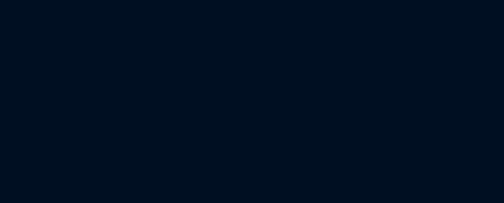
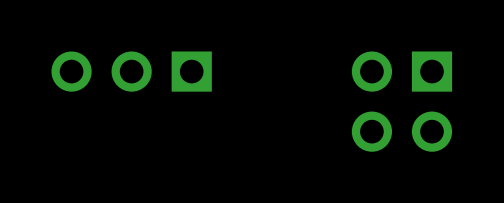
part: none -> (131, 71)
part: none -> (401, 101)

